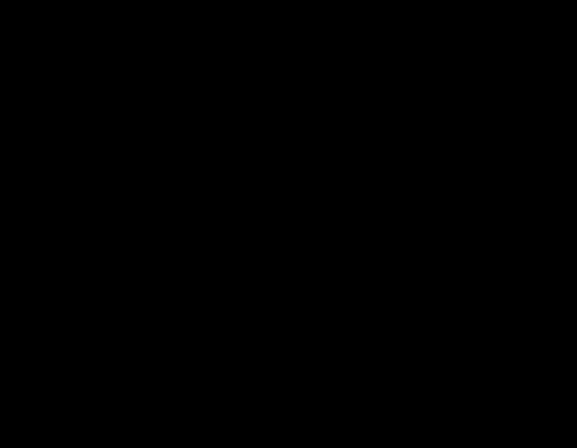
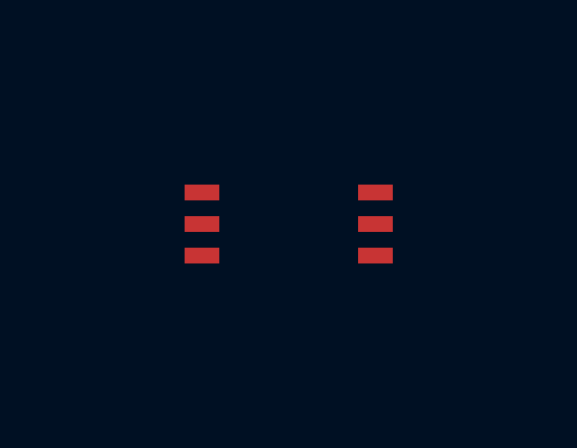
part: none -> (288, 224)

